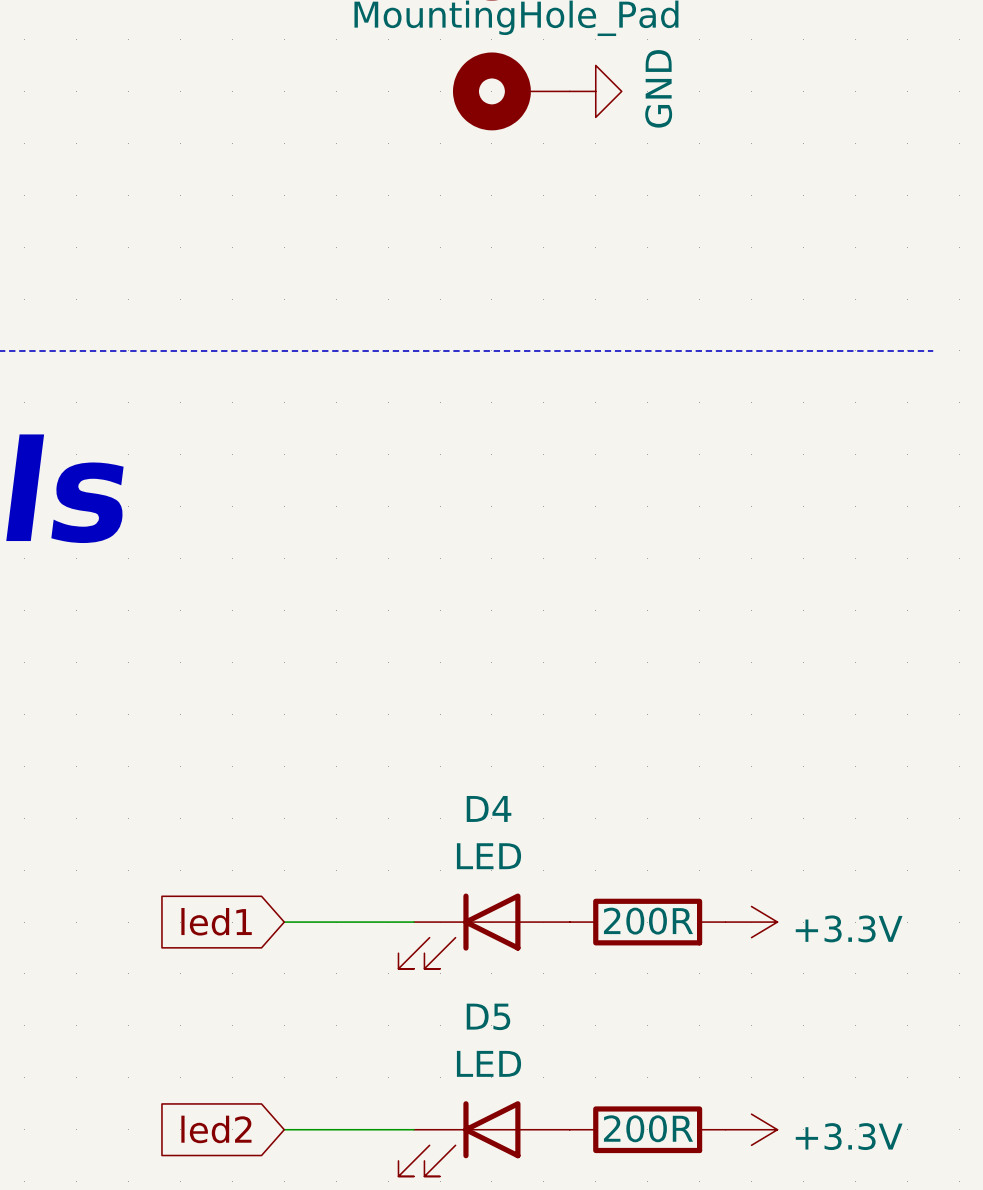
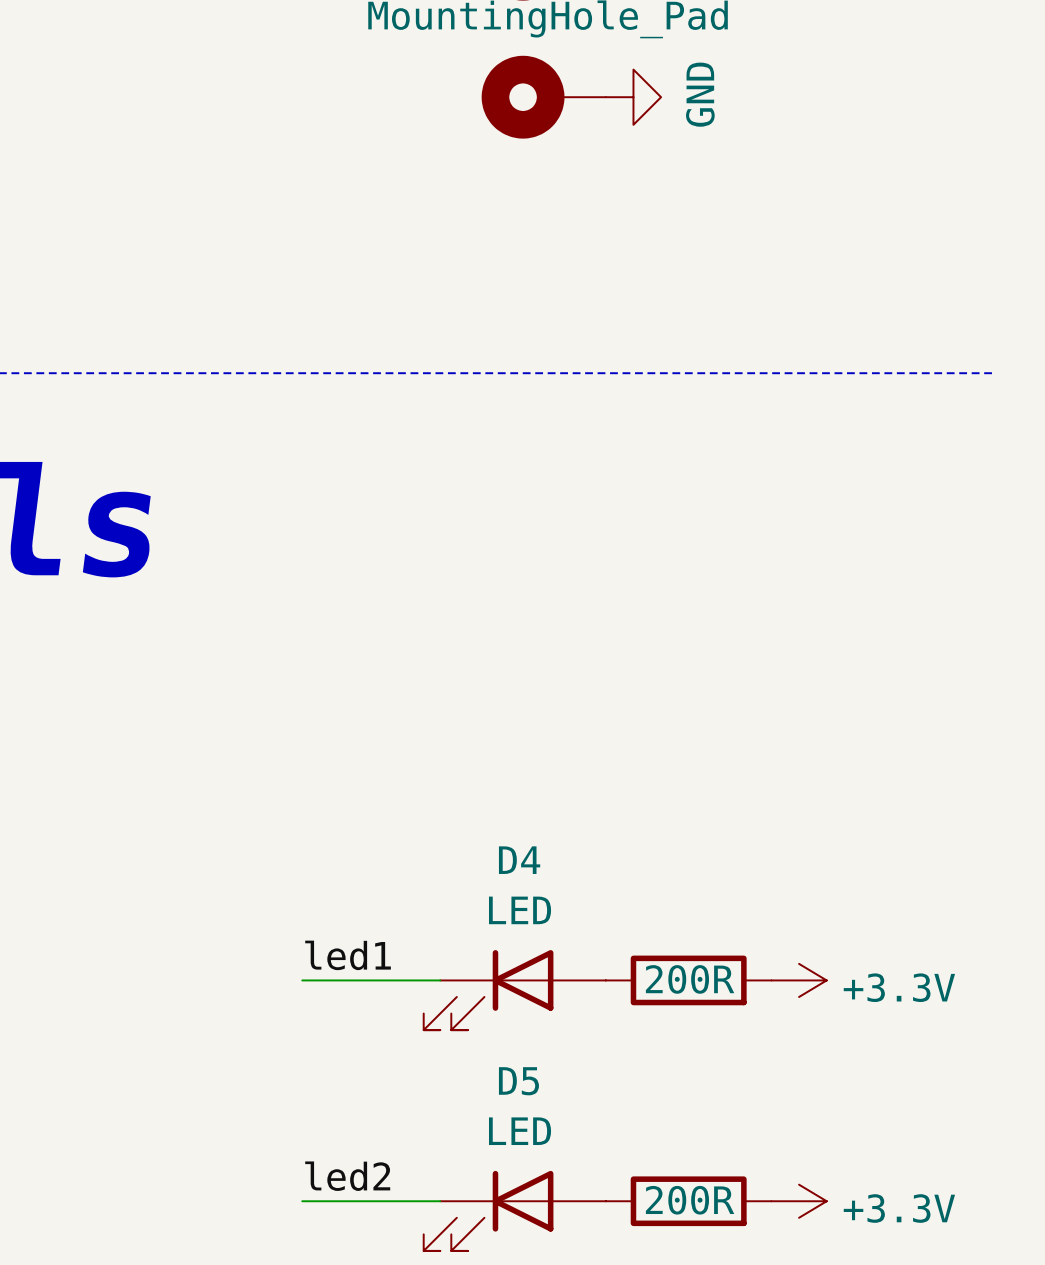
label: none -> led1 (348, 955)
global label: led1 (216, 921) -> none
label: none -> led2 (347, 1176)
global label: led2 (216, 1129) -> none

